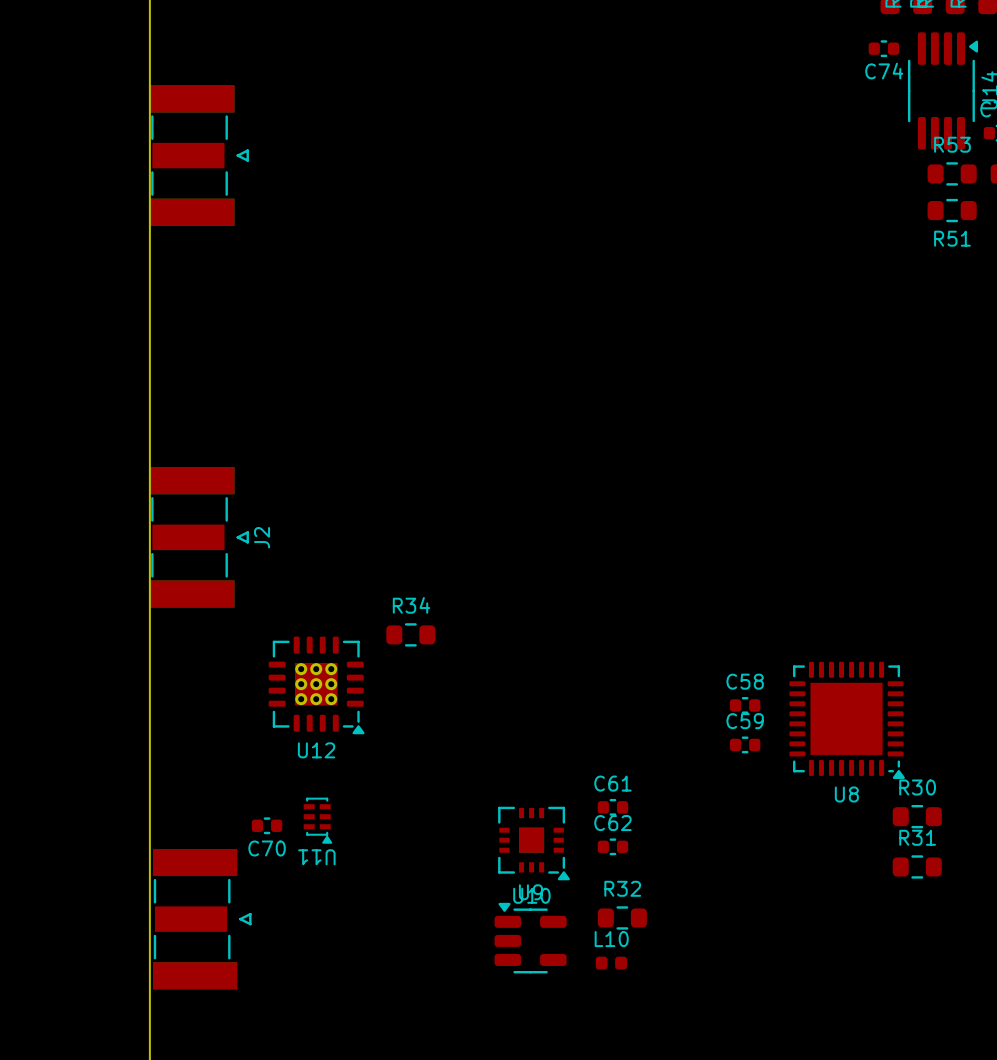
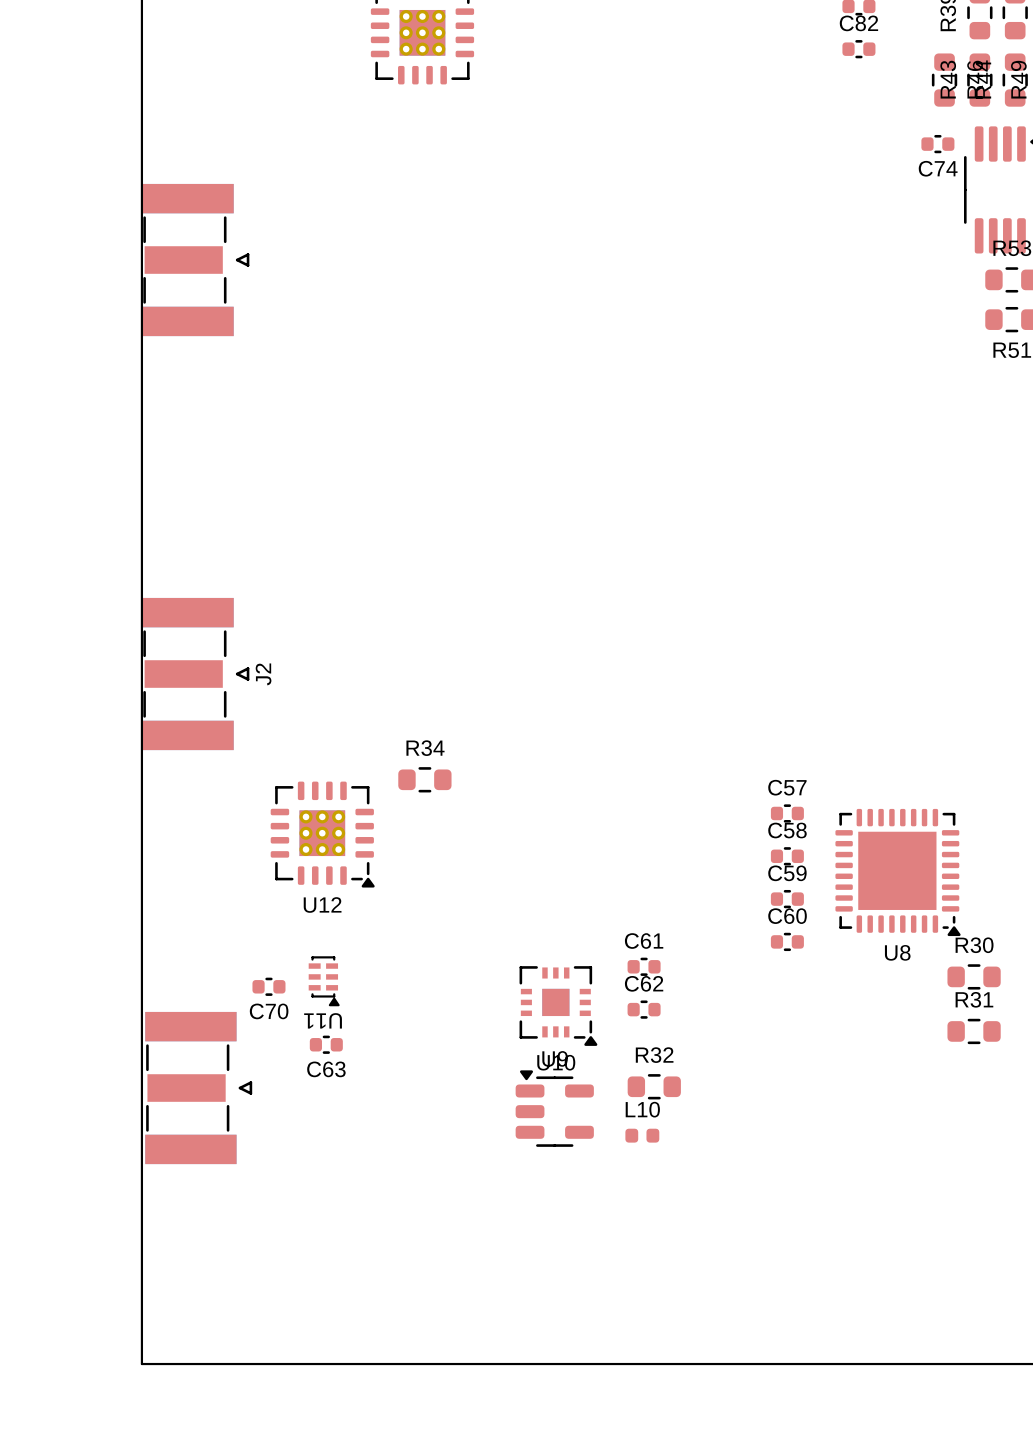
C57: none -> (787, 813)
C60: none -> (787, 941)
C63: none -> (326, 1044)

